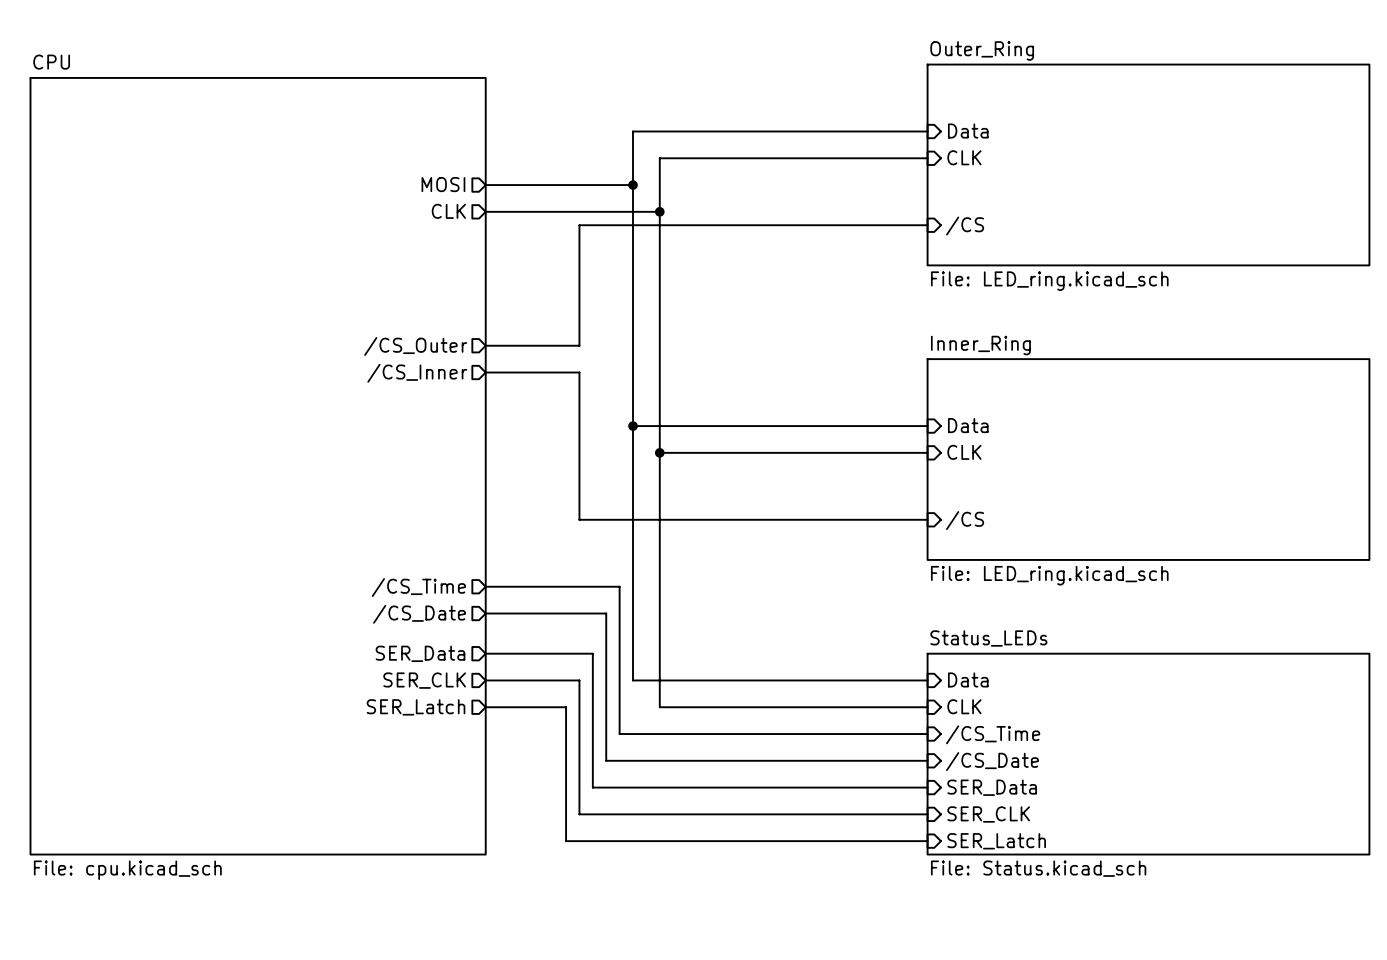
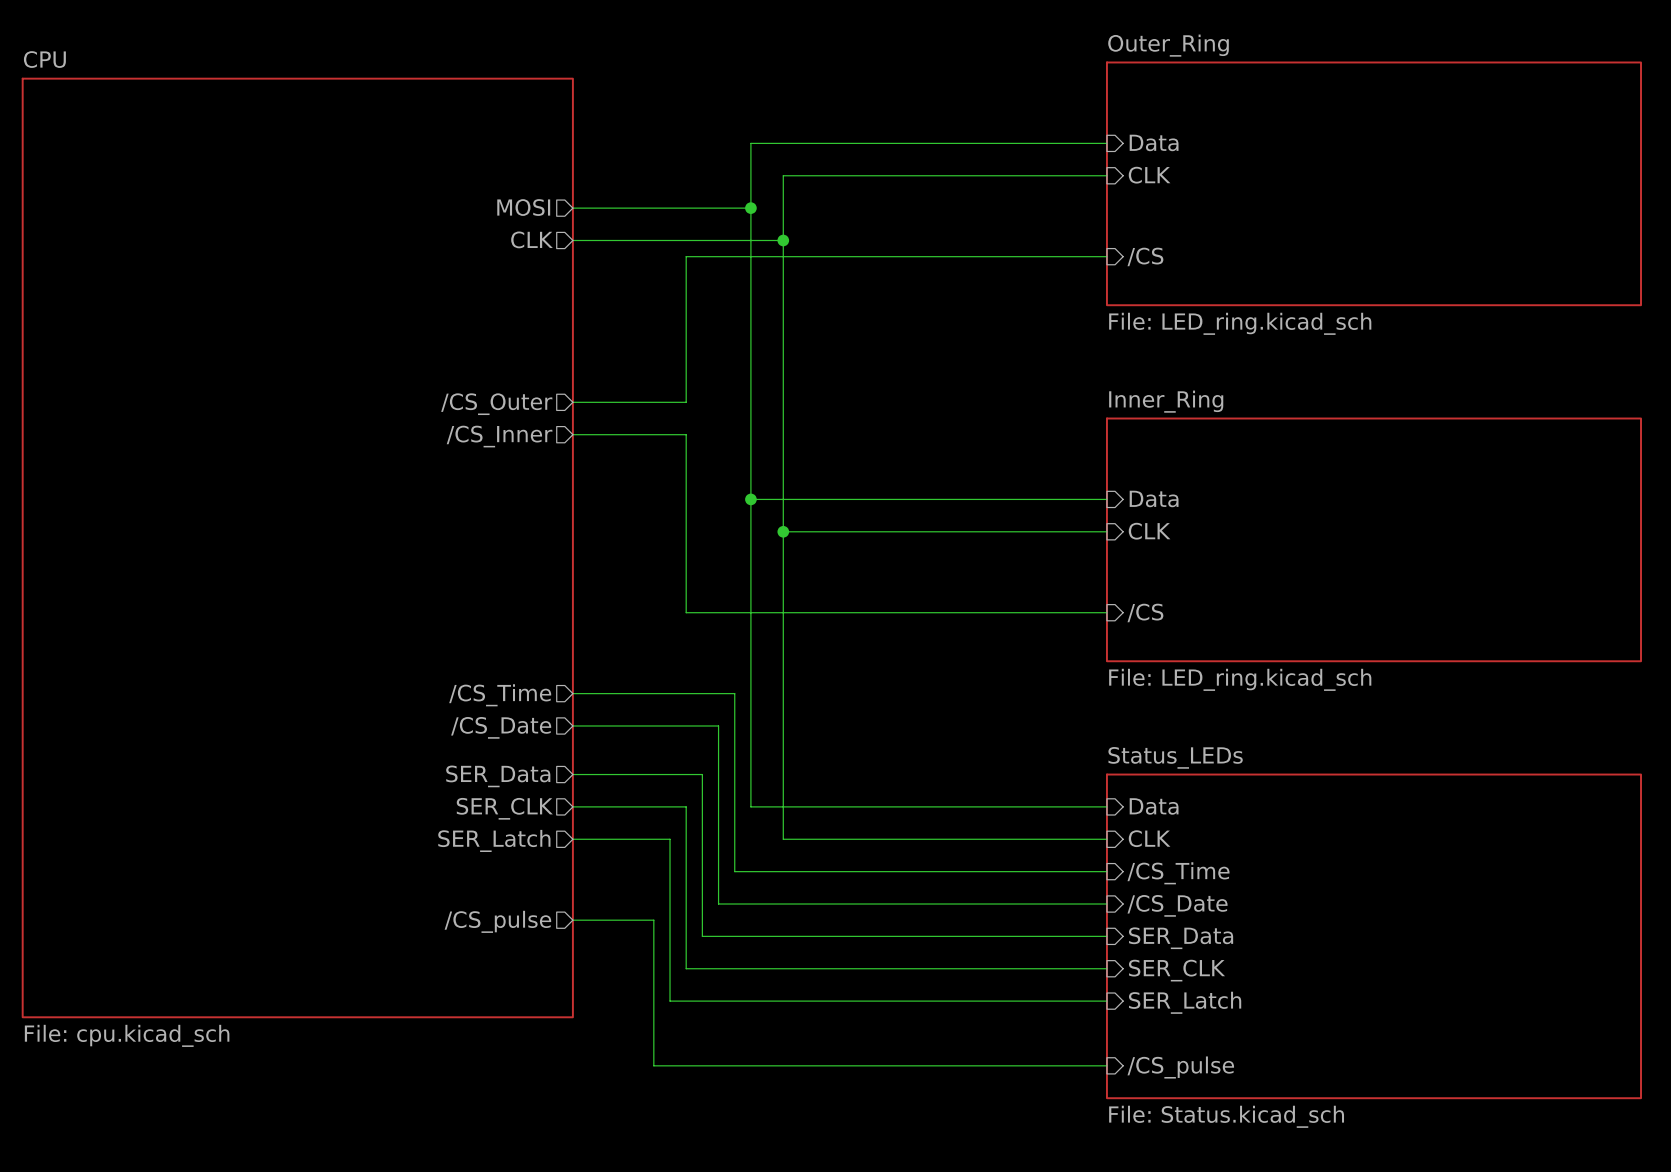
sheet Status_LEDs: File: Status.kicad_sch (1148, 754) -> none
wire: none -> (572, 920) (653, 920) (653, 1065) (1106, 1065)
sheet pin: none -> /CS_pulse (497, 921)
sheet Status_LEDs: none -> File: Status.kicad_sch (1373, 936)
sheet pin: none -> /CS_pulse (1180, 1067)

